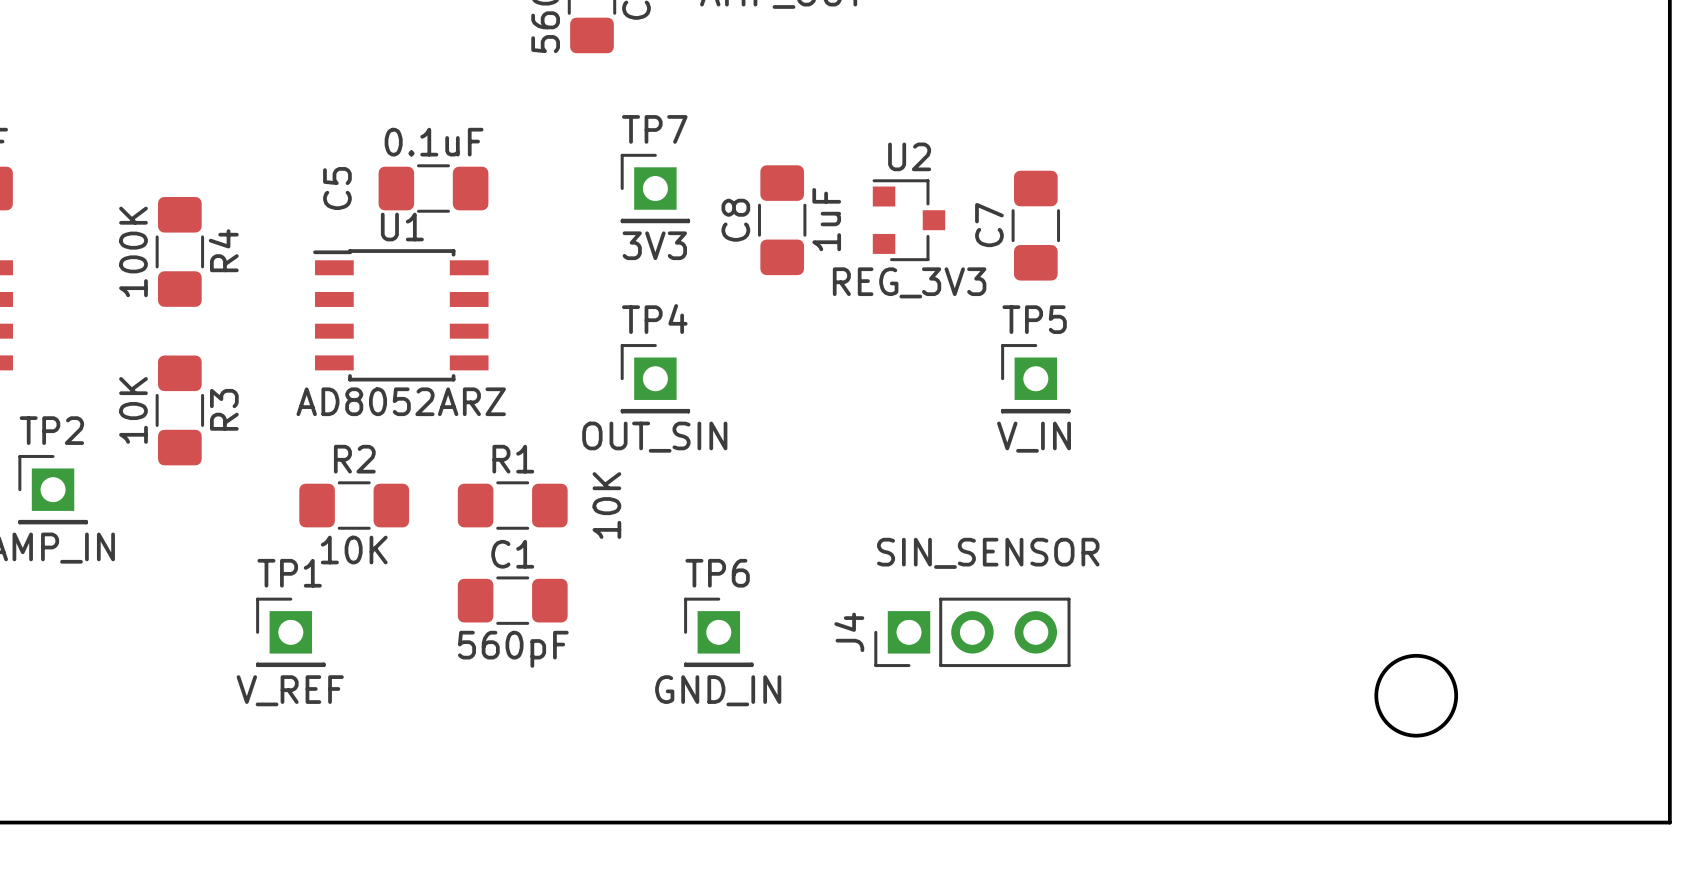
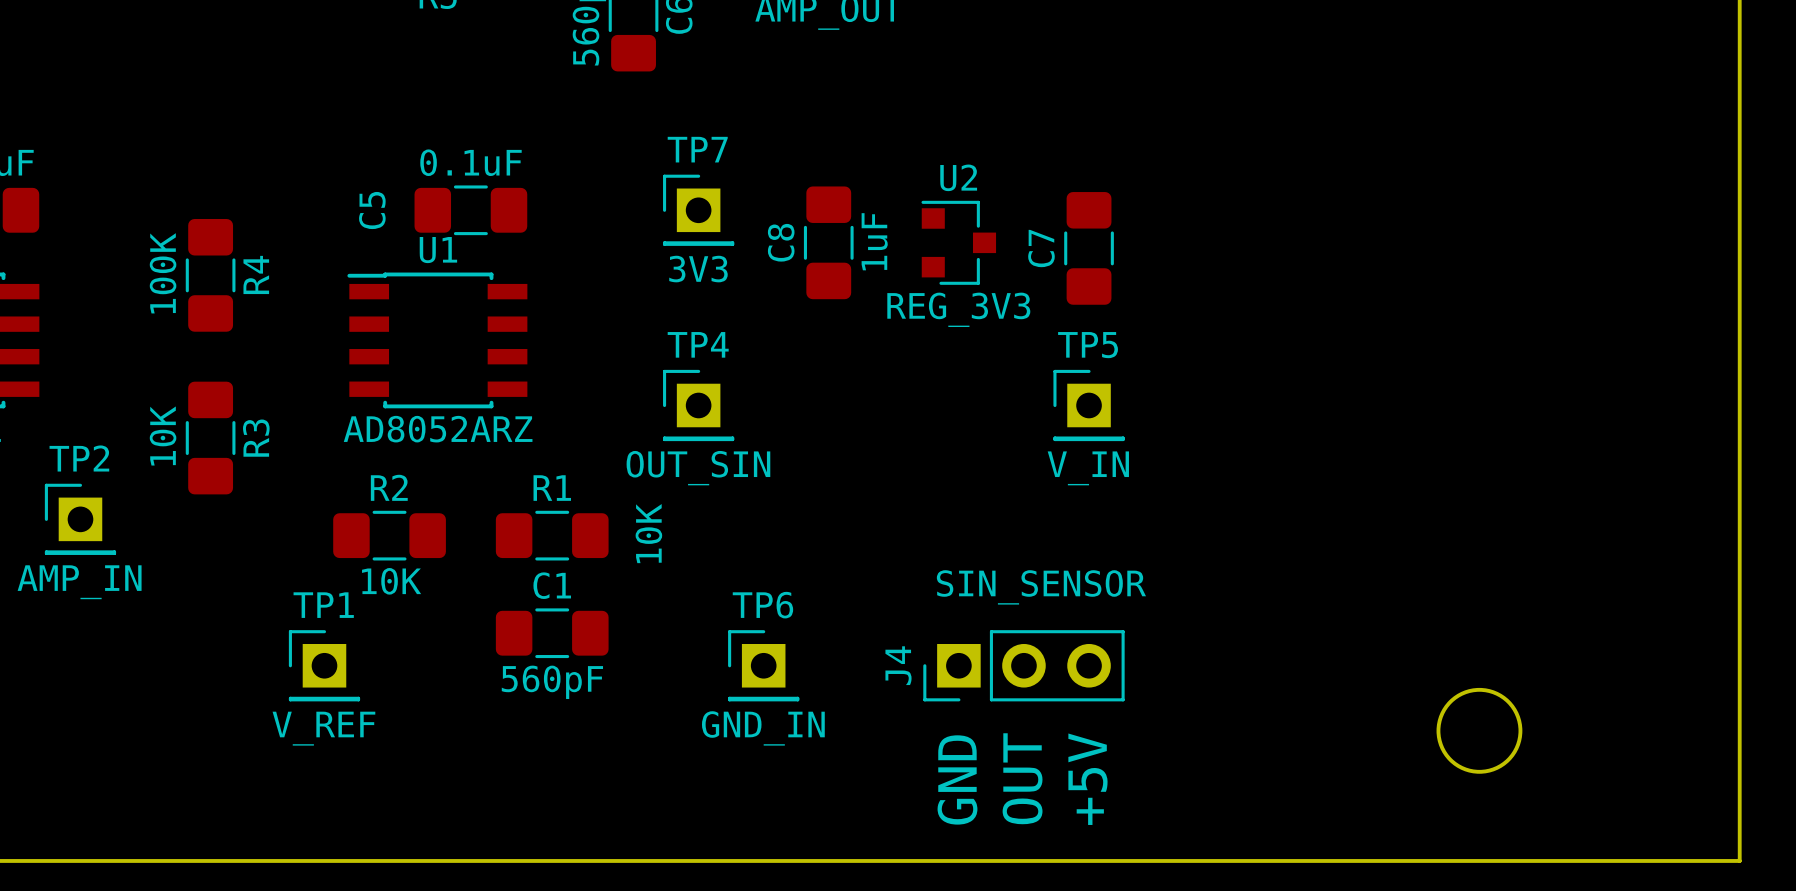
text: none -> +5V (1087, 779)
text: none -> OUT (1022, 778)
text: none -> GND (957, 779)

